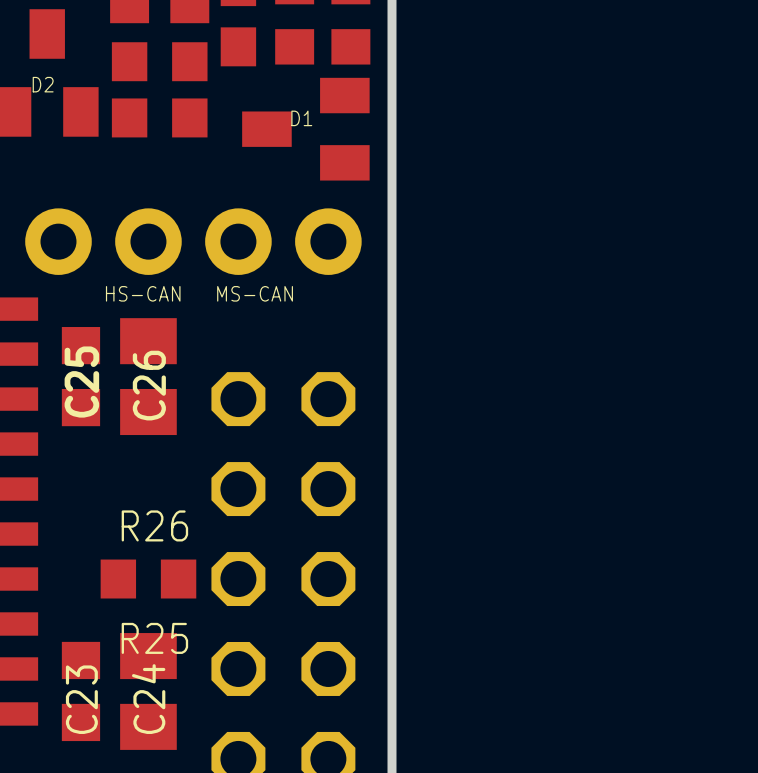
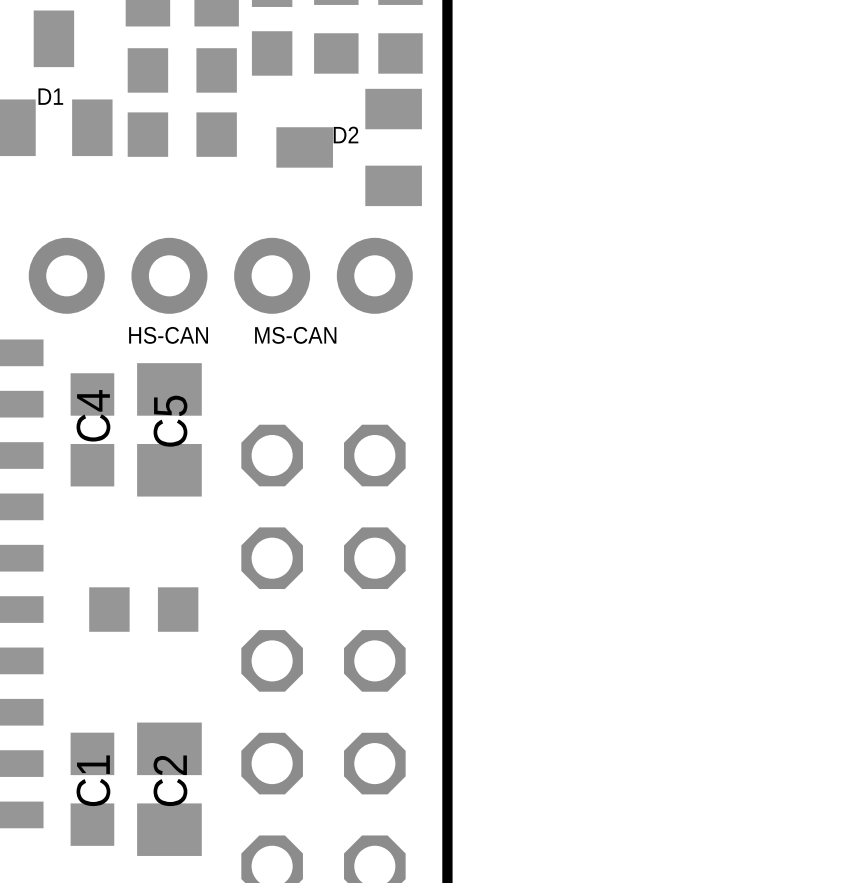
D2 name: D2 (43, 84) -> D1 (50, 96)
D1 name: D1 (301, 118) -> D2 (346, 135)
C25 name: C25 (81, 382) -> C4 (93, 415)
C26 name: C26 (149, 385) -> C5 (170, 421)
R26: (154, 525) -> none
part: none -> (143, 609)
R25: (148, 579) -> none
C23 name: C23 (81, 699) -> C1 (93, 780)
C24 name: C24 (148, 699) -> C2 (170, 780)

